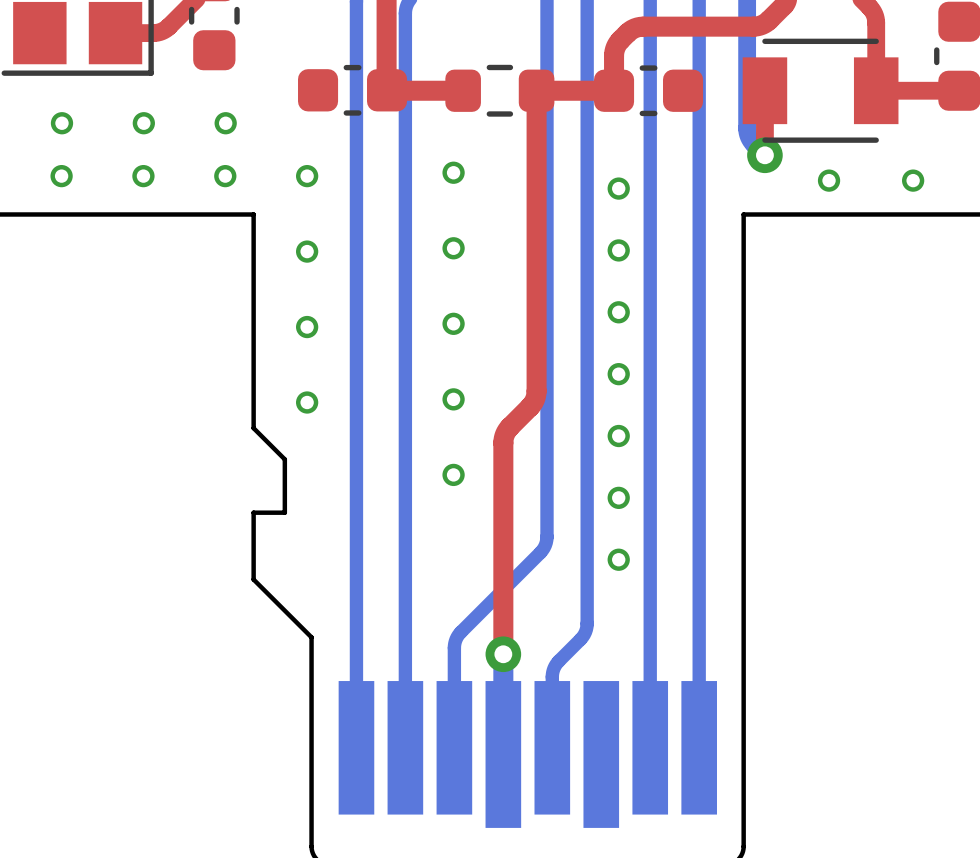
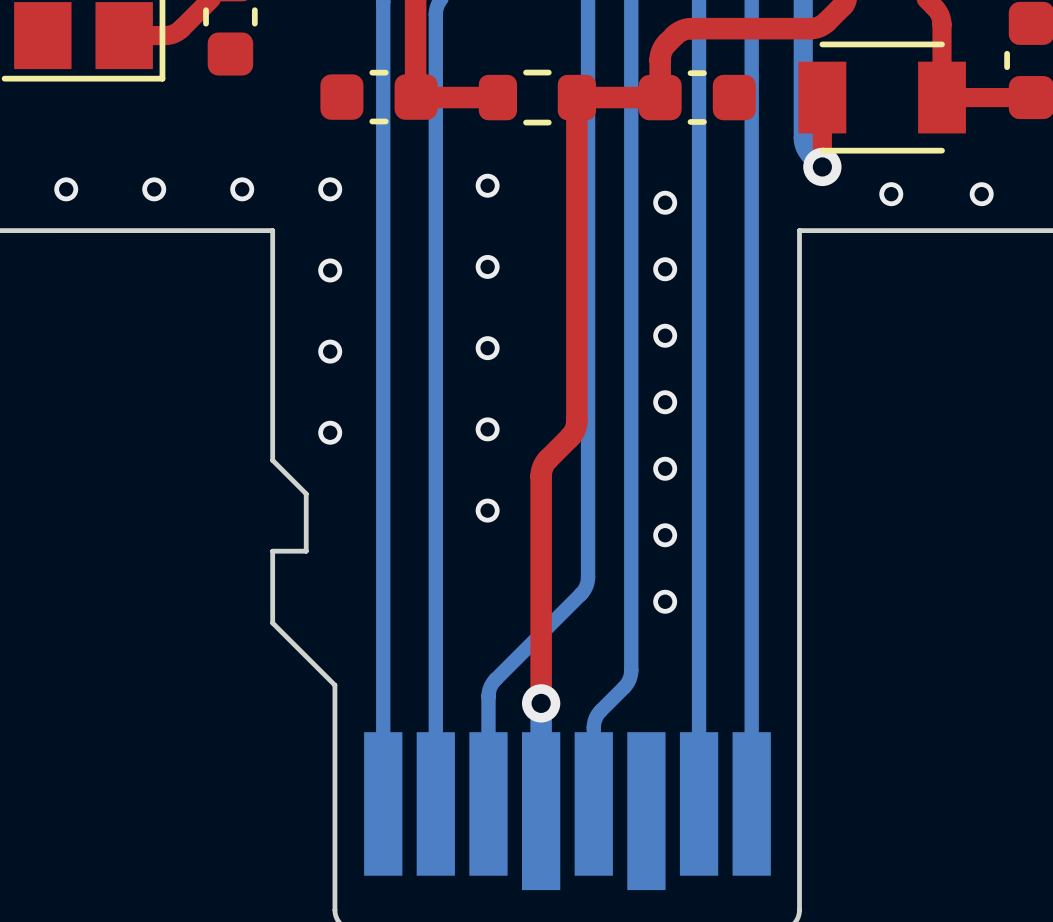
via: (61, 123) -> none
via: (143, 123) -> none
via: (225, 123) -> none

